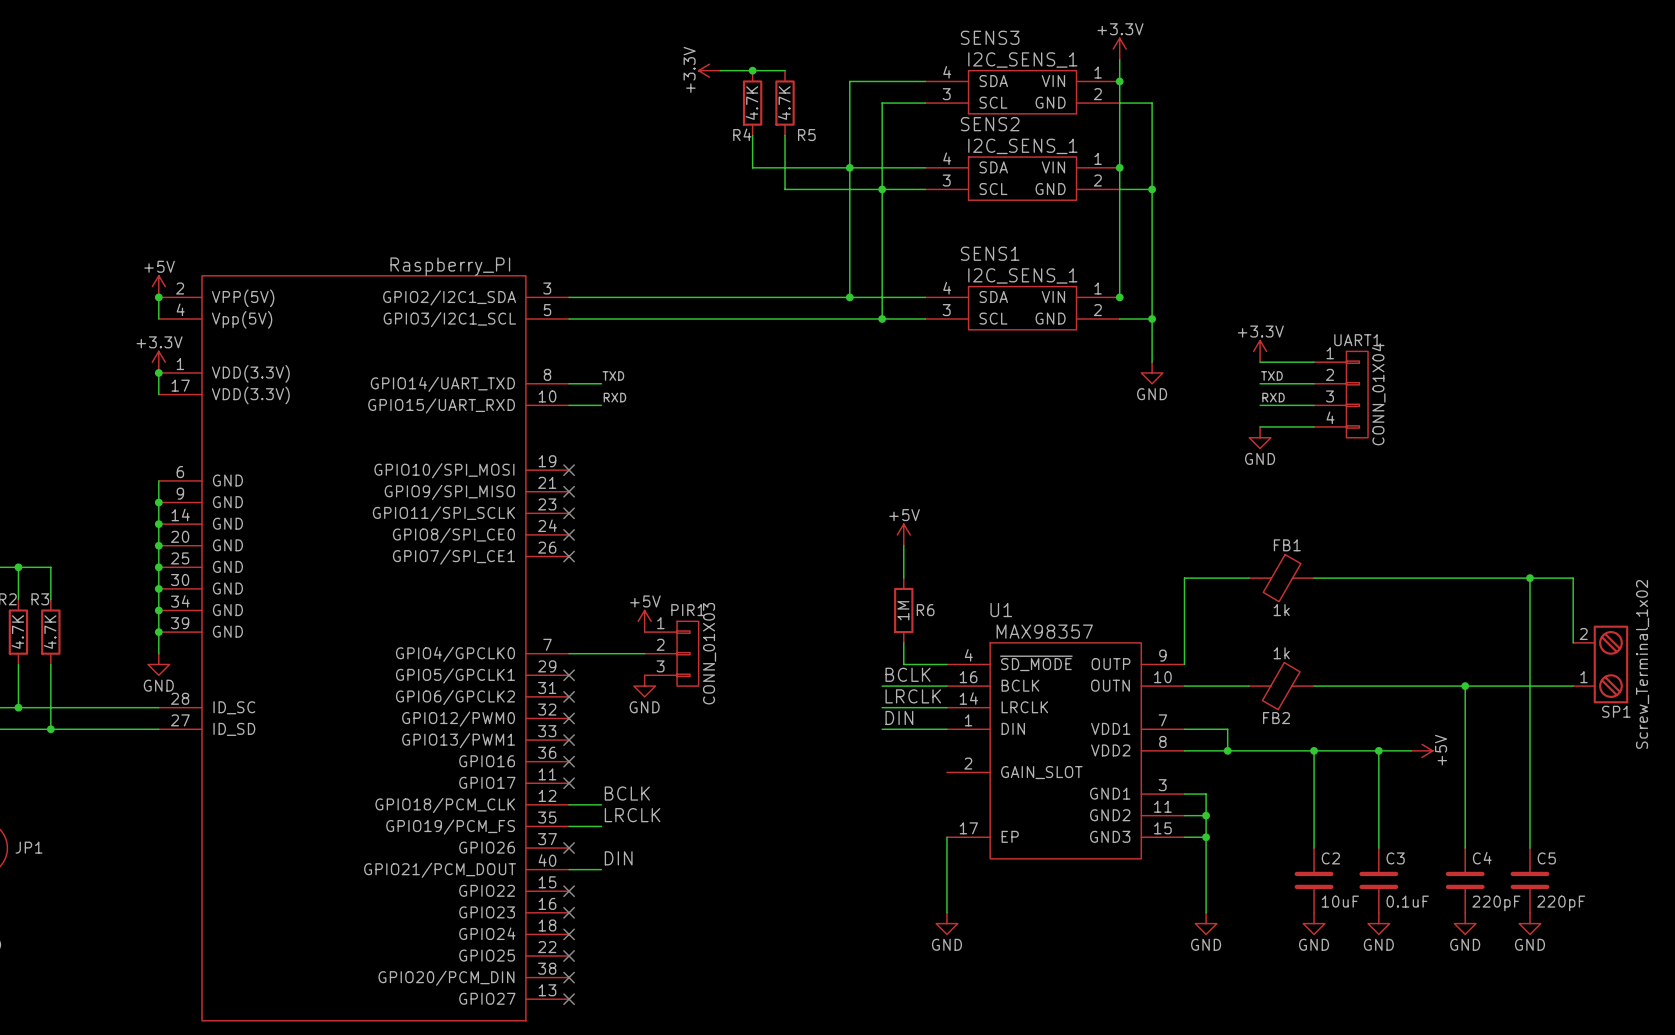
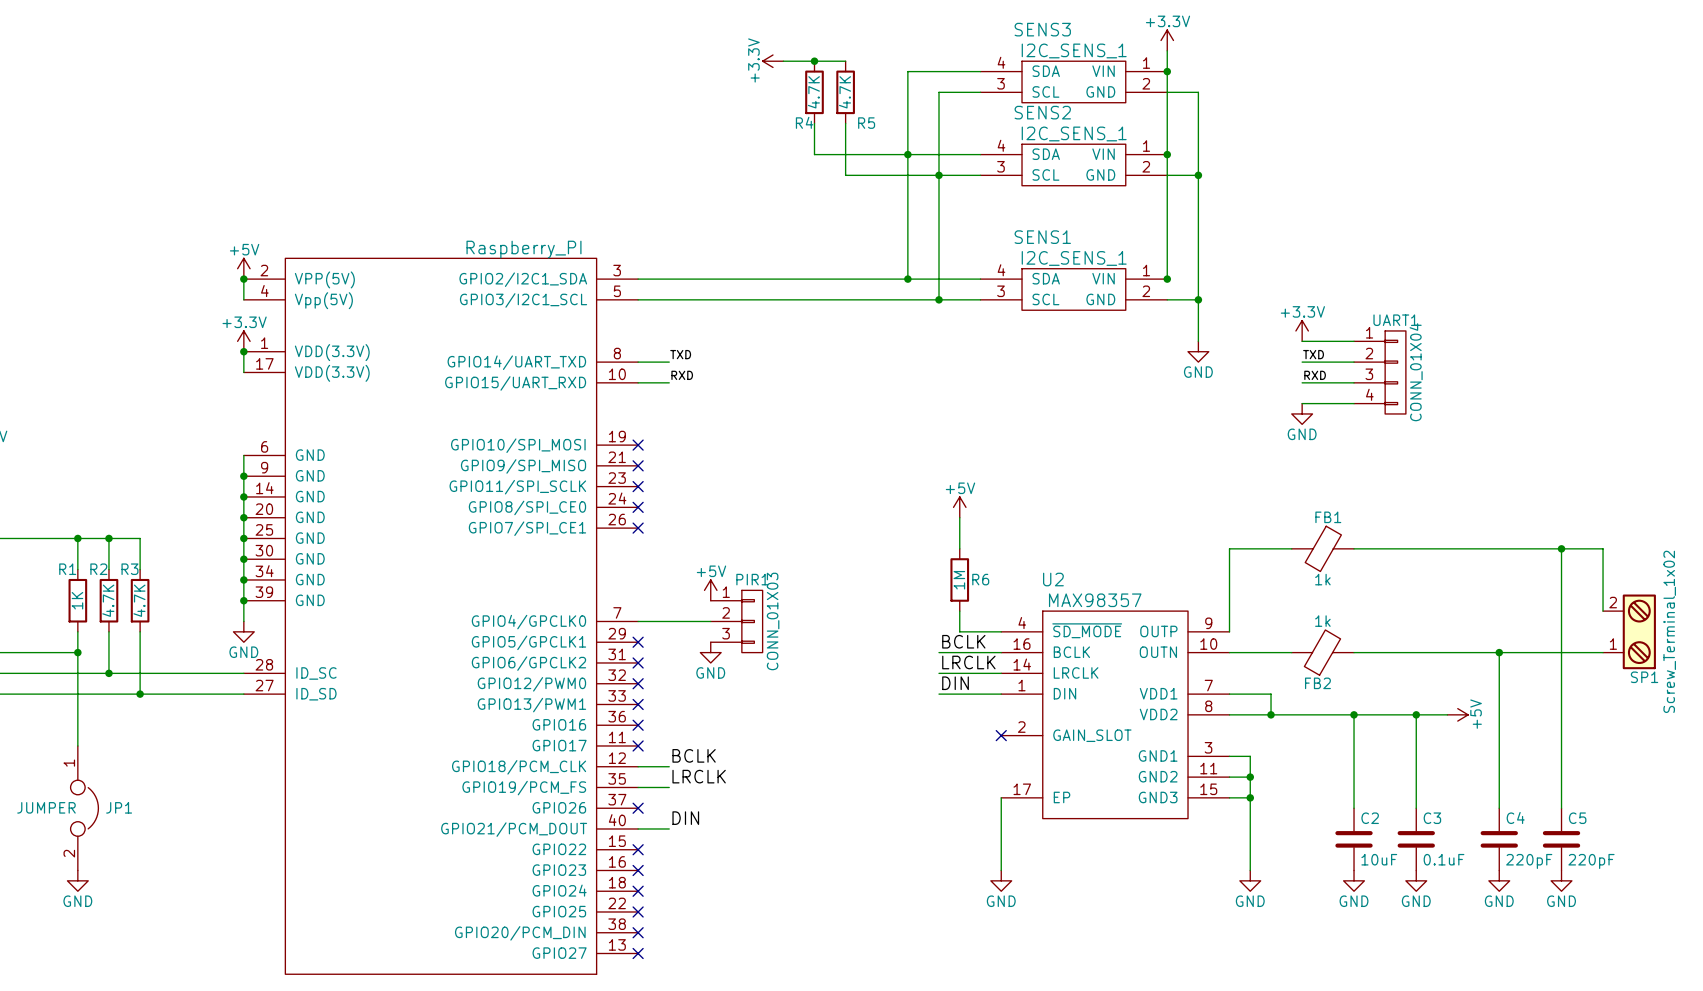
U1 name: U1 (1001, 610) -> U2 (1053, 579)
no-connect mark: none -> (1001, 735)

